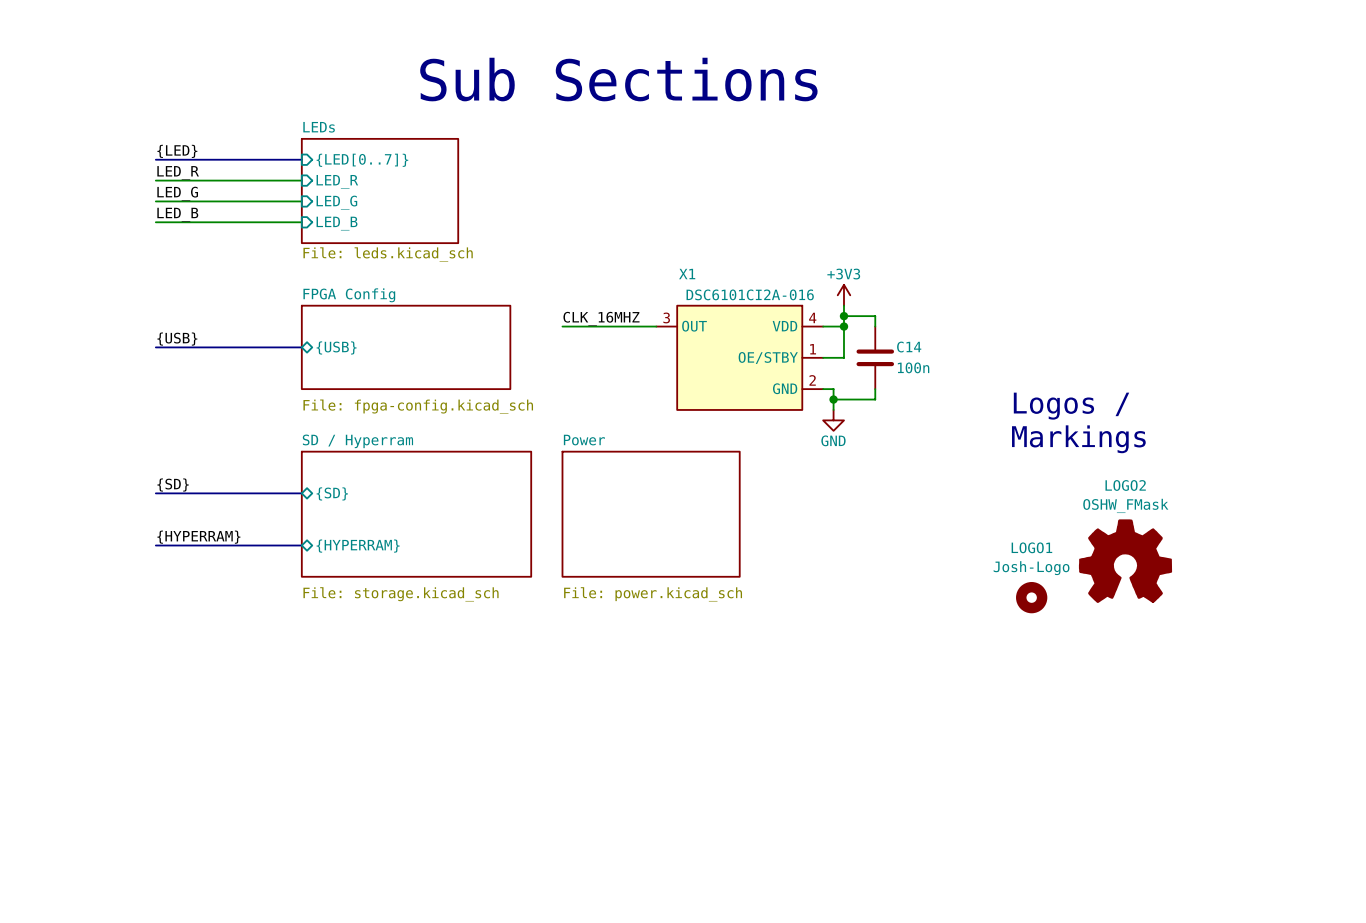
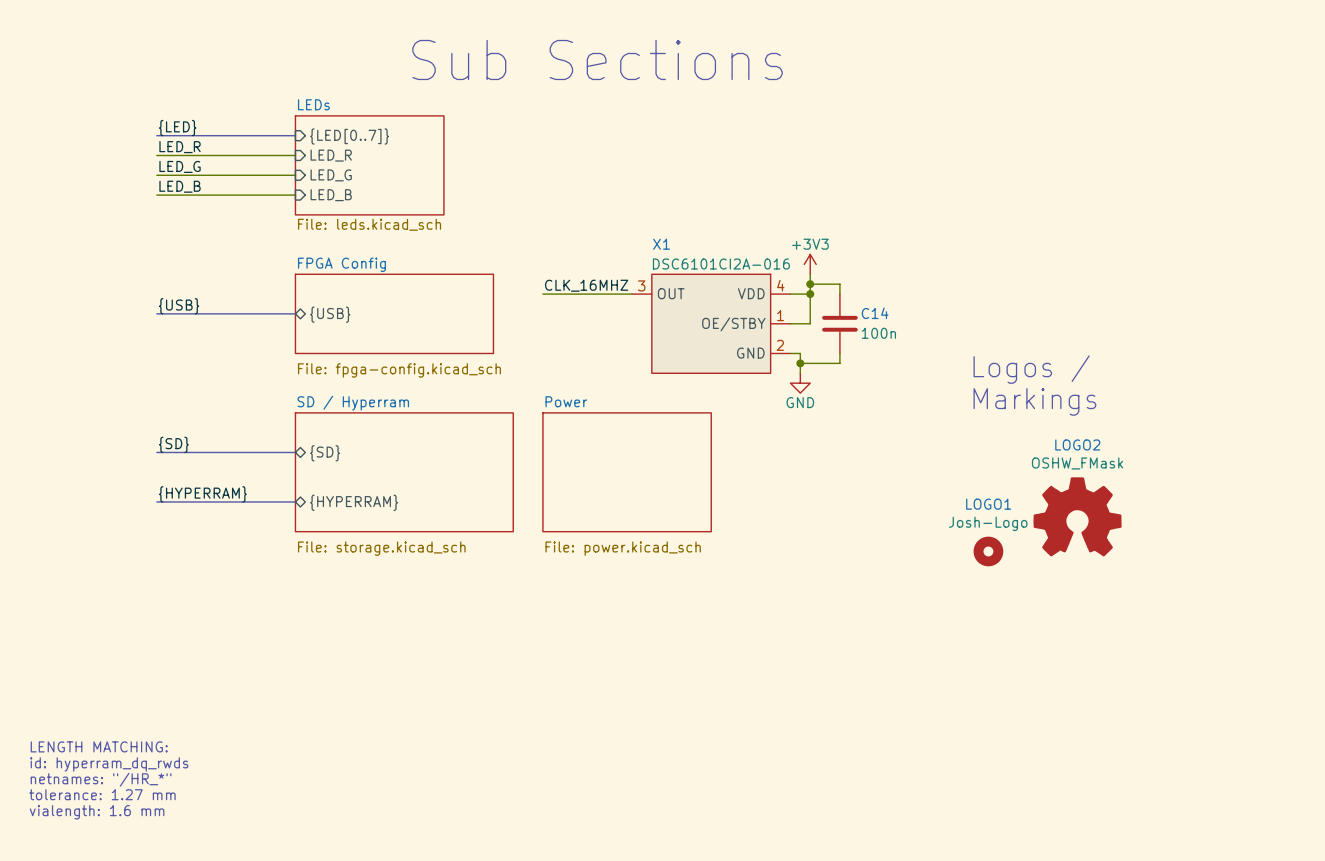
text: none -> LENGTH MATCHING: (99, 746)
text: none -> id: hyperram_dq_rwds (109, 764)
text: none -> netnames: "/HR_*" (101, 779)
text: none -> tolerance: 1.27 mm (102, 794)
text: none -> vialength: 1.6 mm (97, 812)

